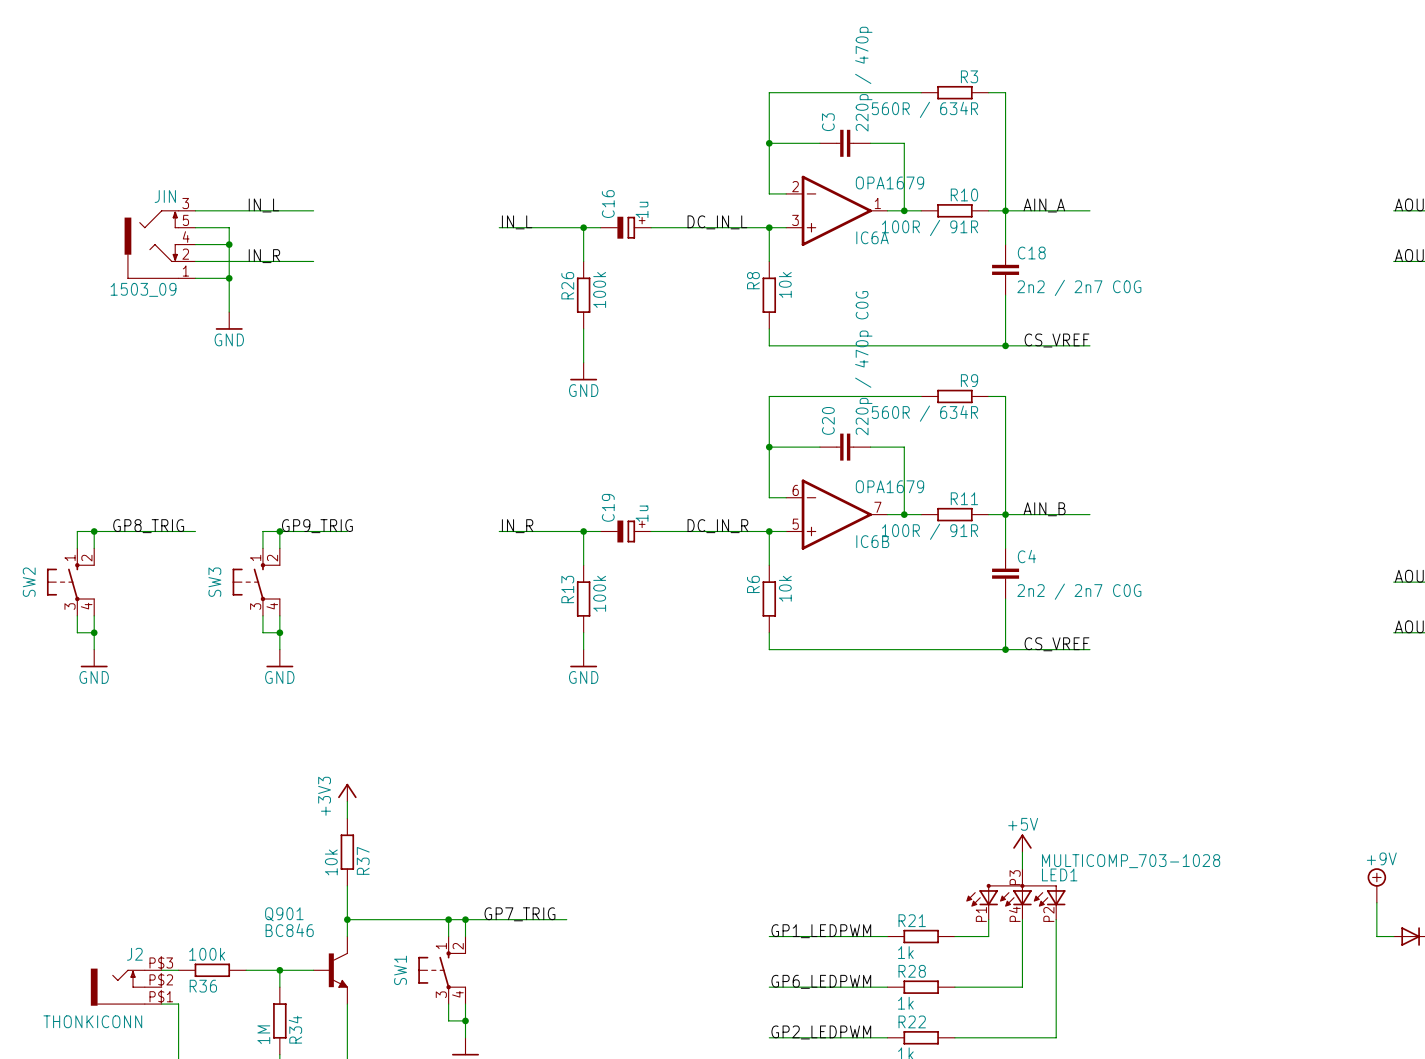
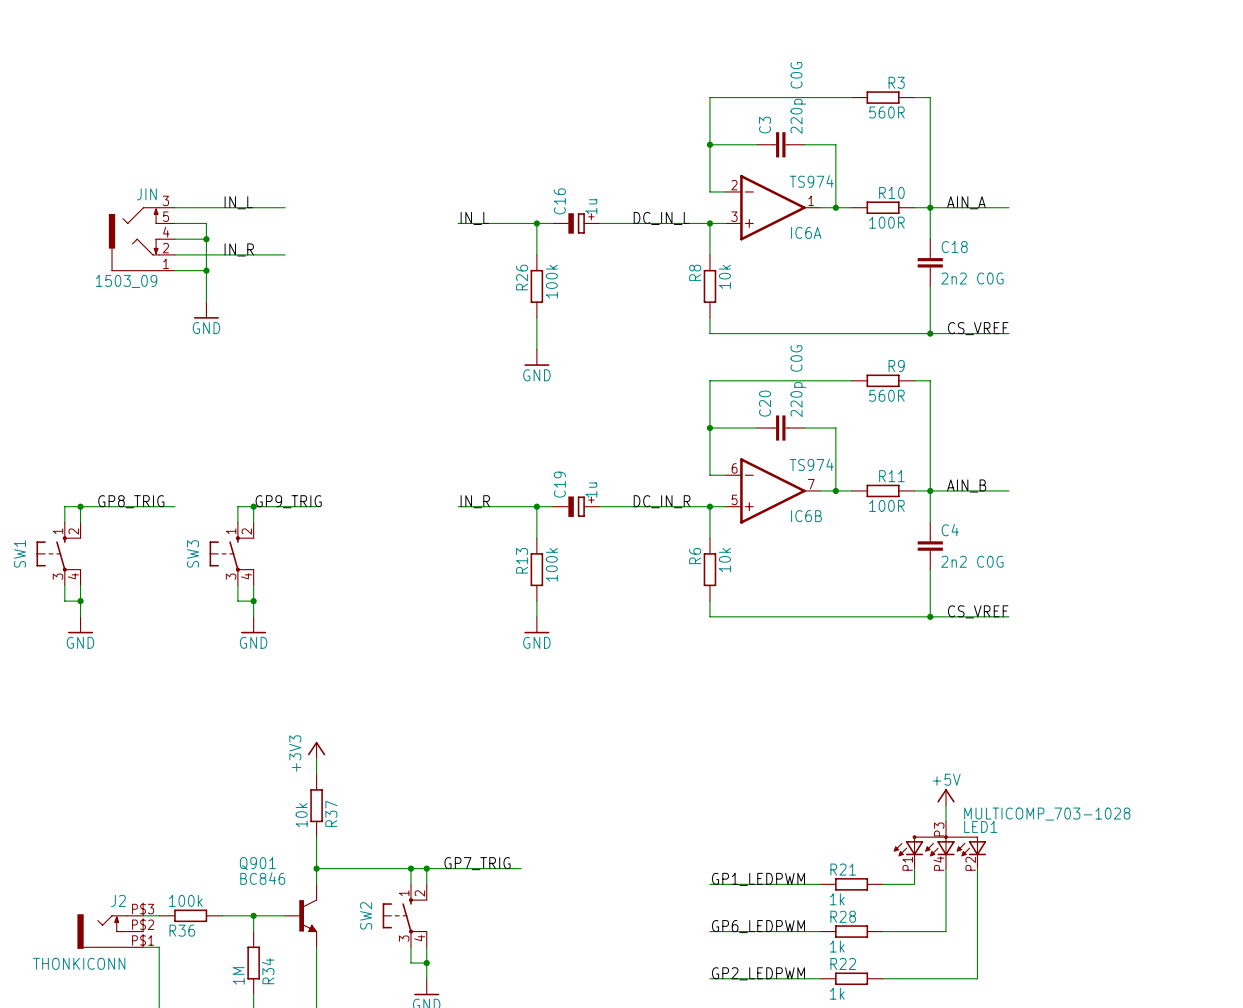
C3 value: 220p / 470p (863, 79) -> 220p C0G (798, 97)
R3 value: 560R / 634R (924, 109) -> 560R (886, 112)
IC6A value: OPA1679 (889, 182) -> TS974 (811, 181)
R10 value: 100R / 91R (930, 227) -> 100R (886, 222)
C18 value: 2n2 / 2n7 C0G (1079, 287) -> 2n2 C0G (972, 278)
C20 value: 220p / 470p C0G (863, 363) -> 220p C0G (798, 381)
R9 value: 560R / 634R (924, 413) -> 560R (886, 395)
IC6B value: OPA1679 (889, 486) -> TS974 (811, 464)
R11 value: 100R / 91R (930, 531) -> 100R (886, 505)
SW2 name: SW2 (29, 582) -> SW1 (19, 553)
C4 value: 2n2 / 2n7 C0G (1079, 591) -> 2n2 C0G (972, 561)
SW1 name: SW1 (400, 970) -> SW2 (366, 915)

